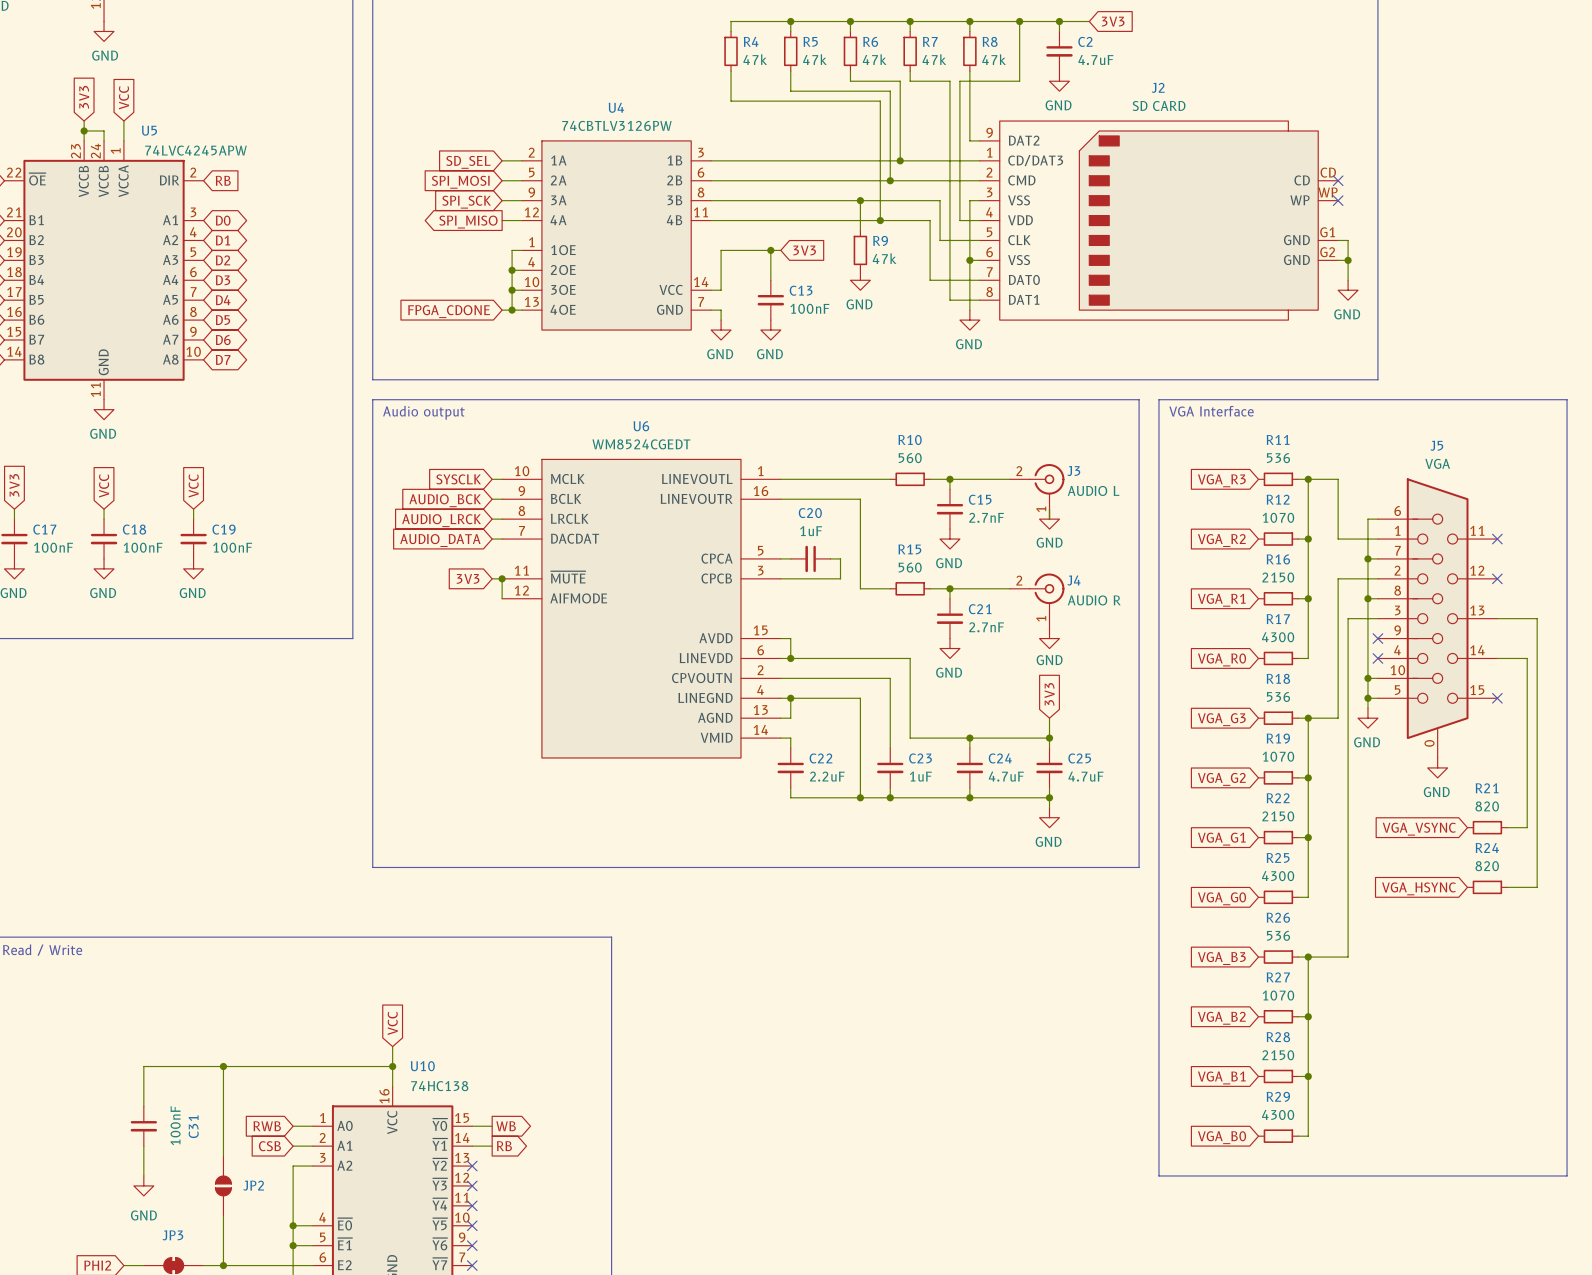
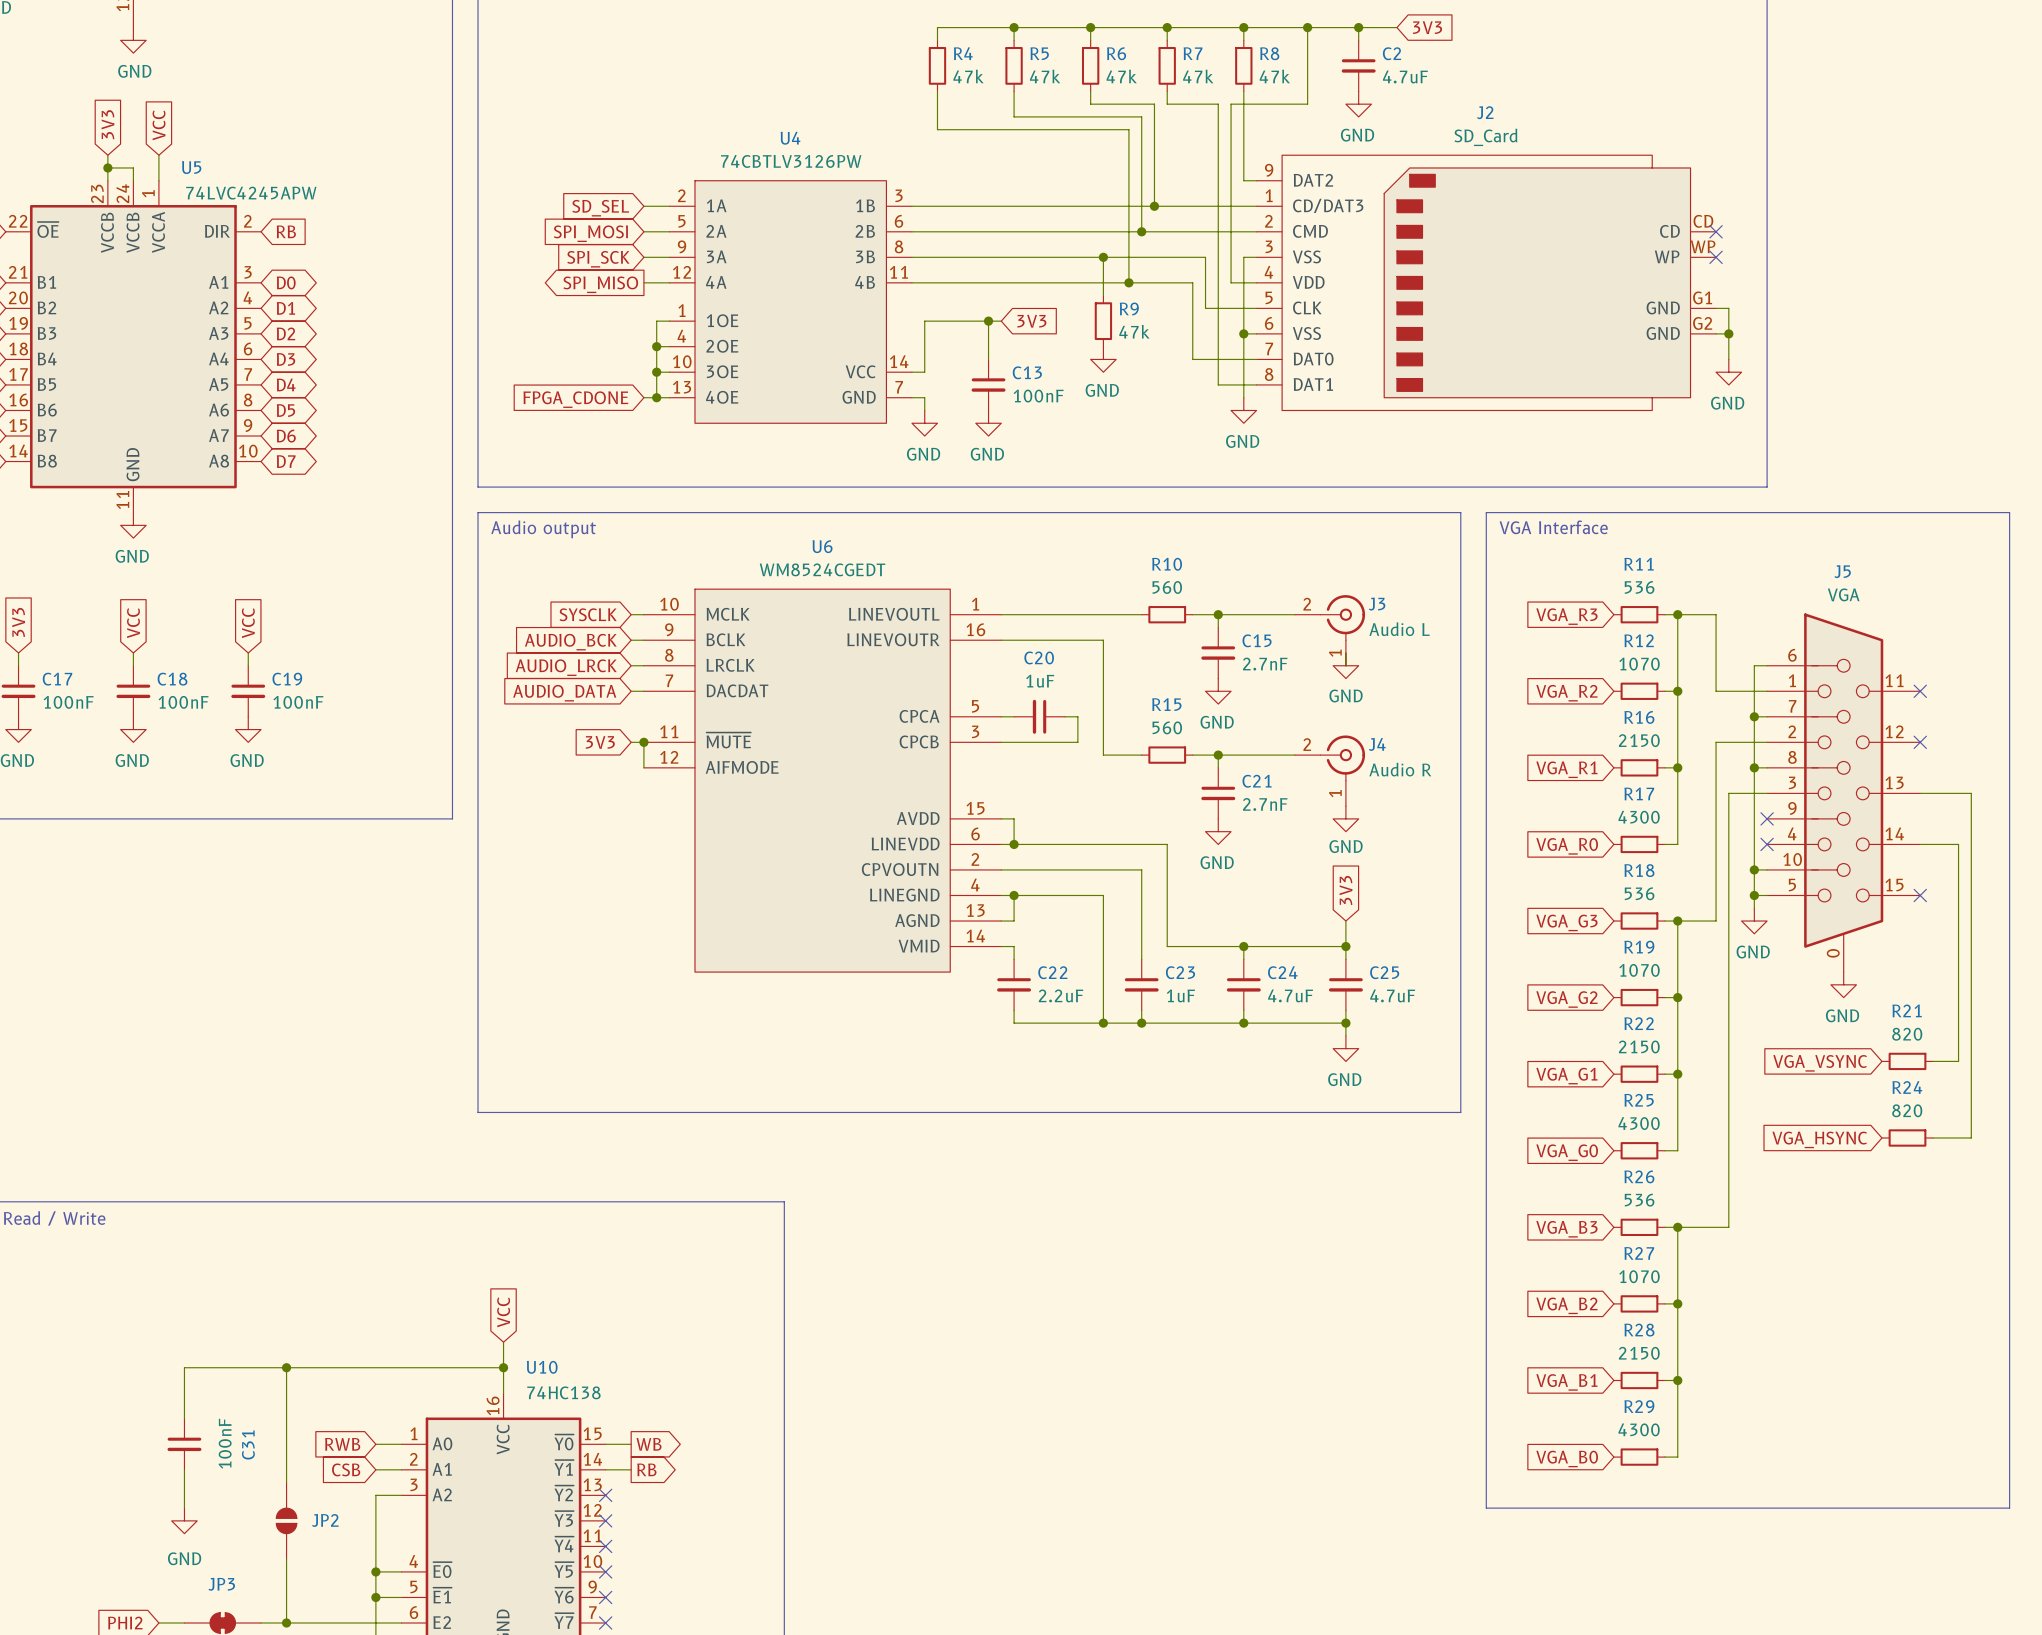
J2 value: SD CARD (1159, 105) -> SD_Card (1485, 137)
J3 value: AUDIO L (1093, 490) -> Audio L (1399, 629)
J4 value: AUDIO R (1094, 600) -> Audio R (1400, 769)

